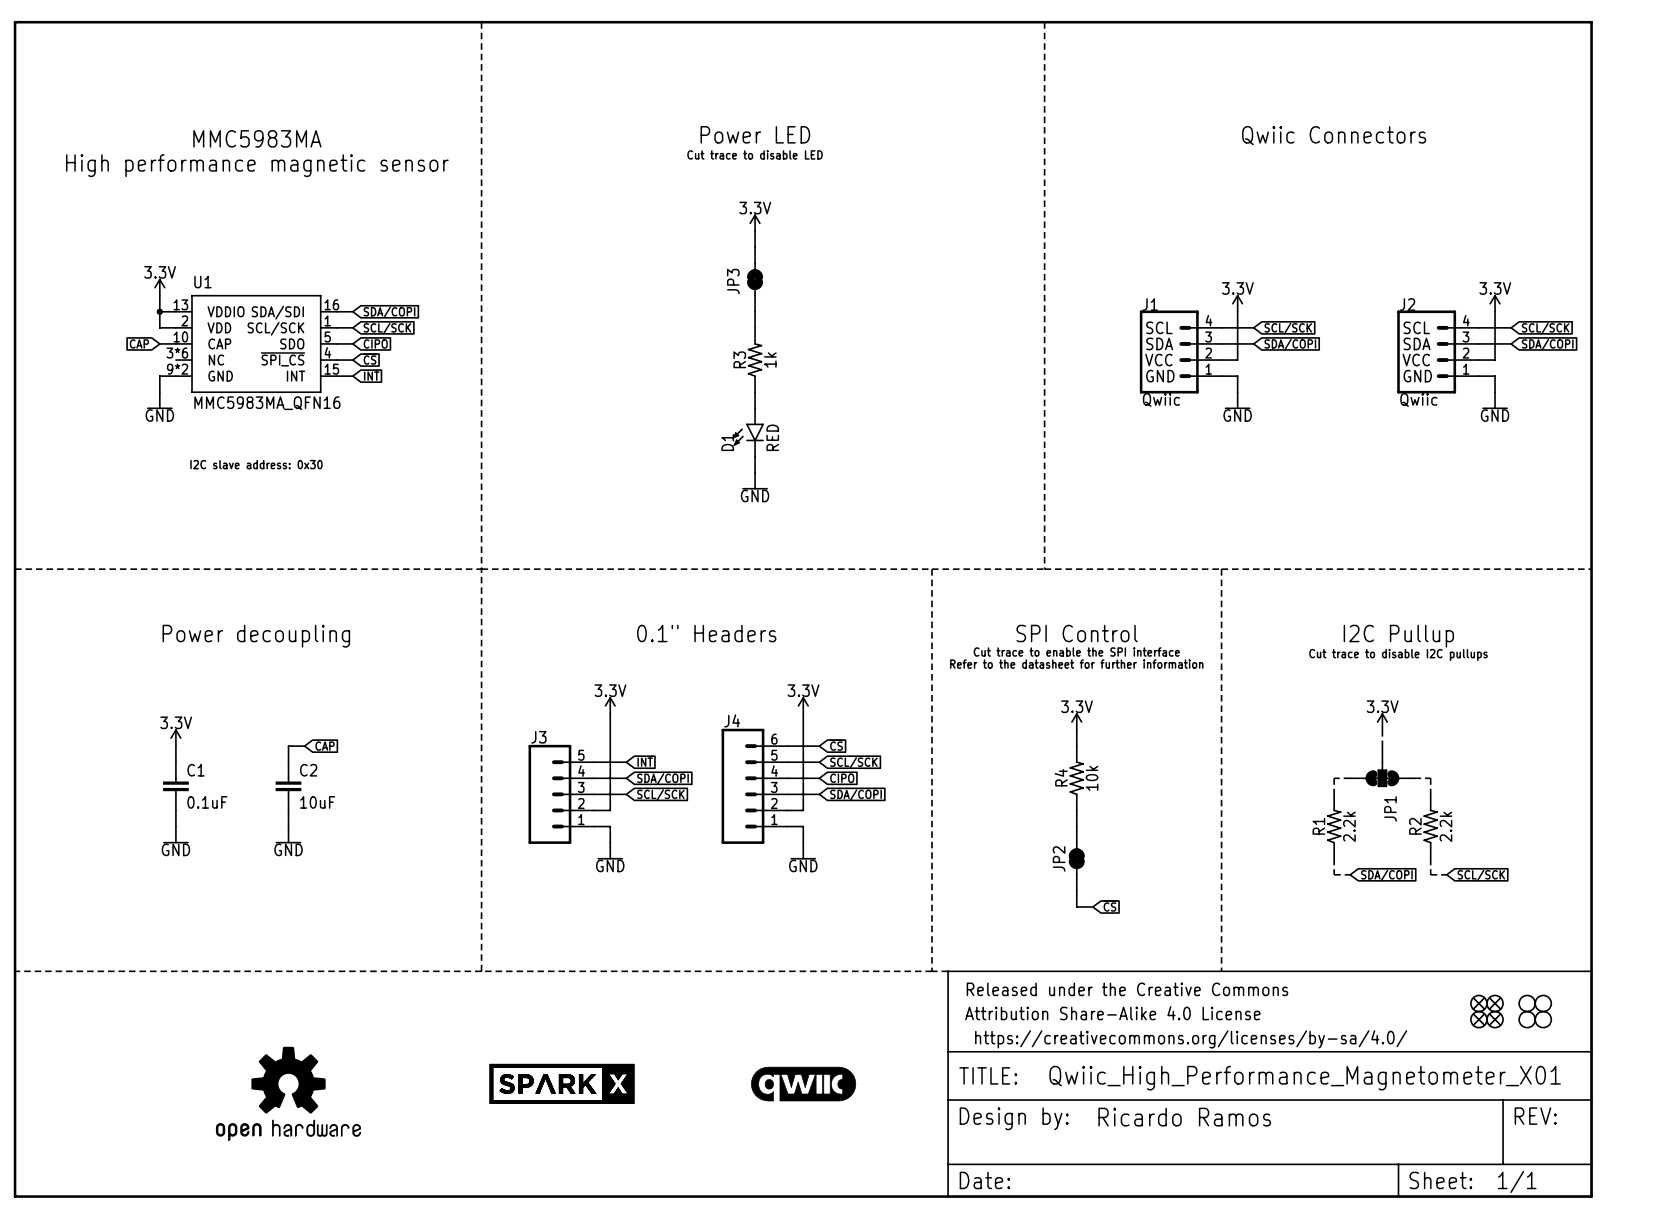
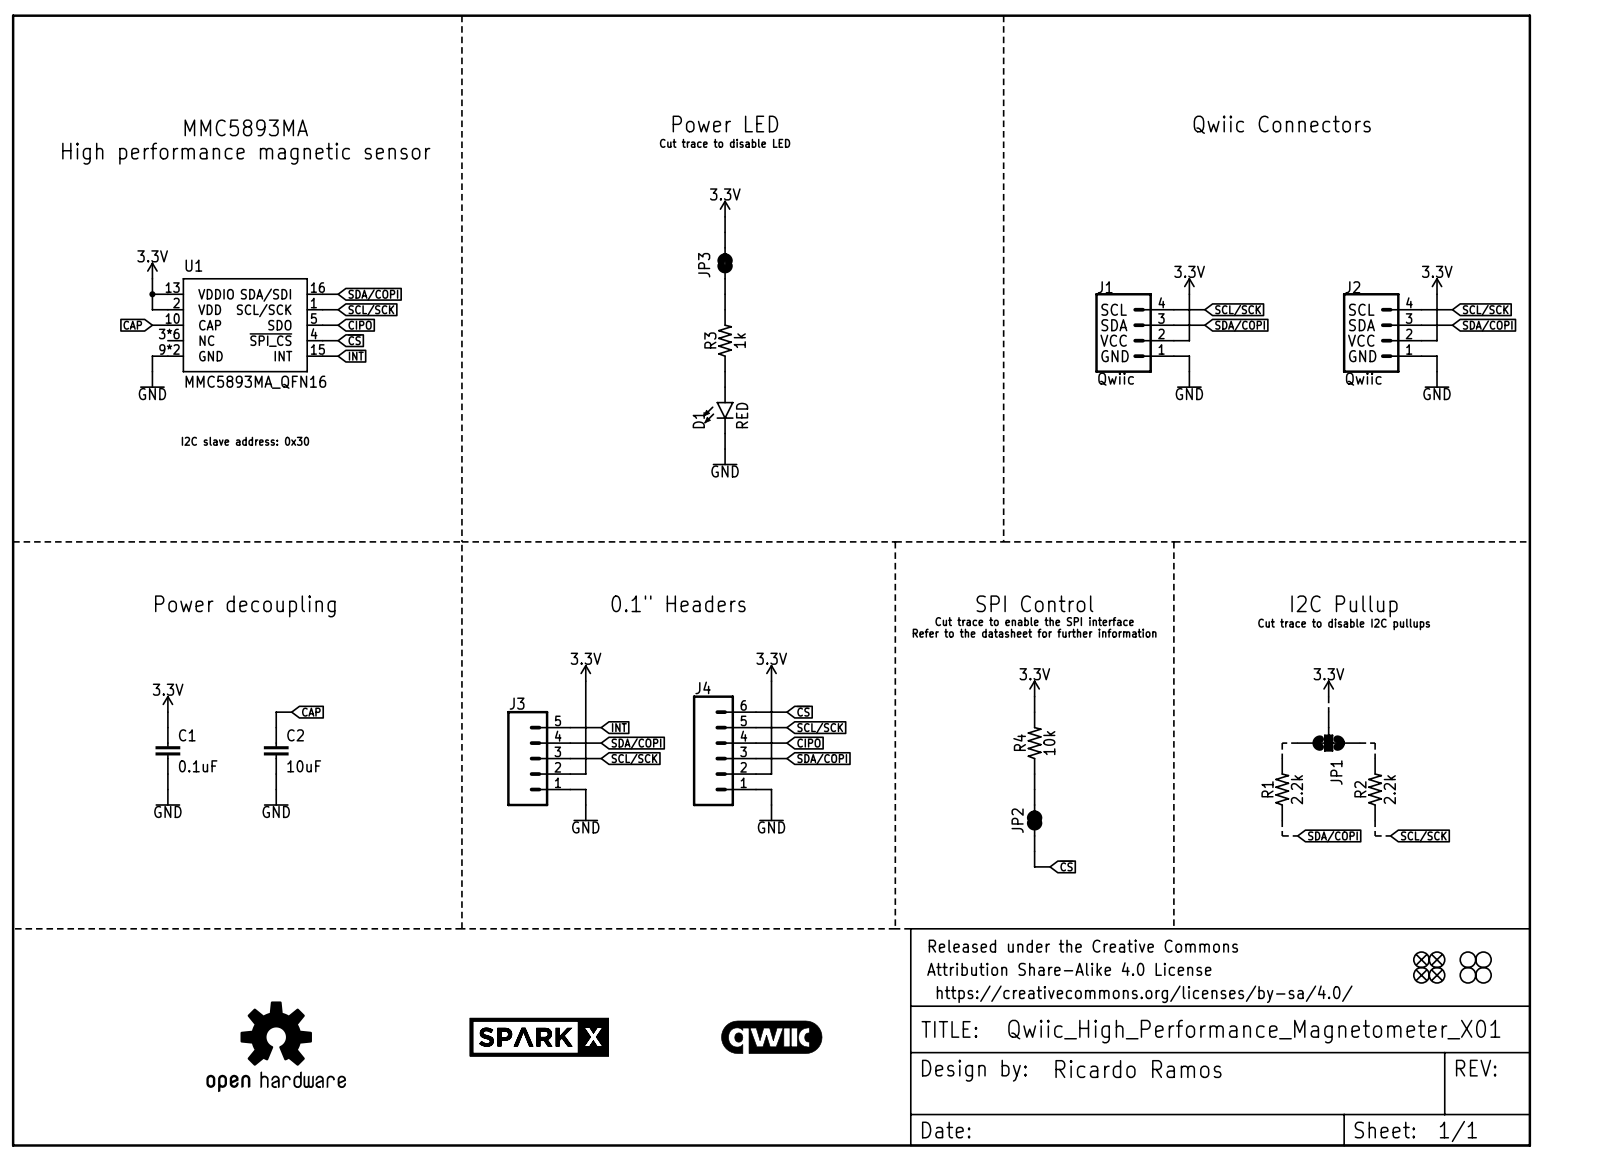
text: MMC5983MA (257, 138) -> MMC5893MA (246, 127)
U1 value: MMC5983MA_QFN16 (267, 403) -> MMC5893MA_QFN16 (255, 382)

